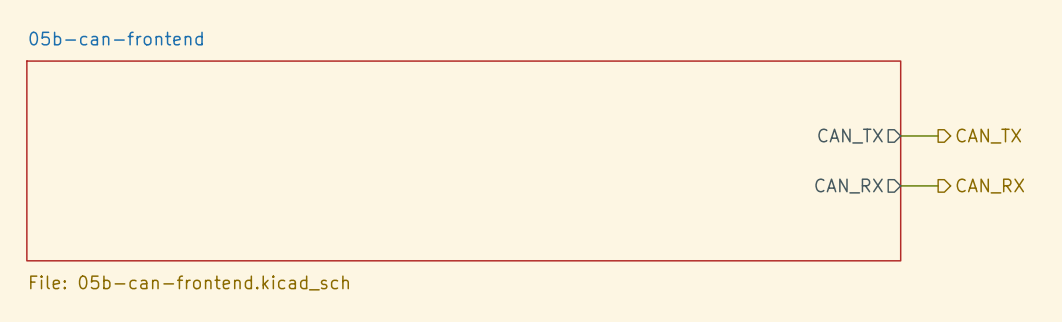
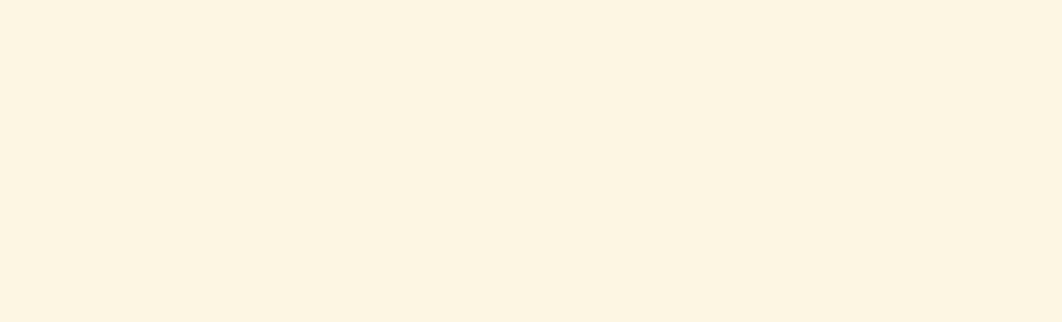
wire: (900, 135) (938, 135) -> none
sheet pin: CAN_TX (850, 136) -> none
hierarchical label: CAN_TX (988, 136) -> none
sheet 05b-can-frontend: File: 05b-can-frontend.kicad_sch (463, 160) -> none
wire: (900, 185) (938, 185) -> none
sheet pin: CAN_RX (849, 186) -> none
hierarchical label: CAN_RX (990, 186) -> none

